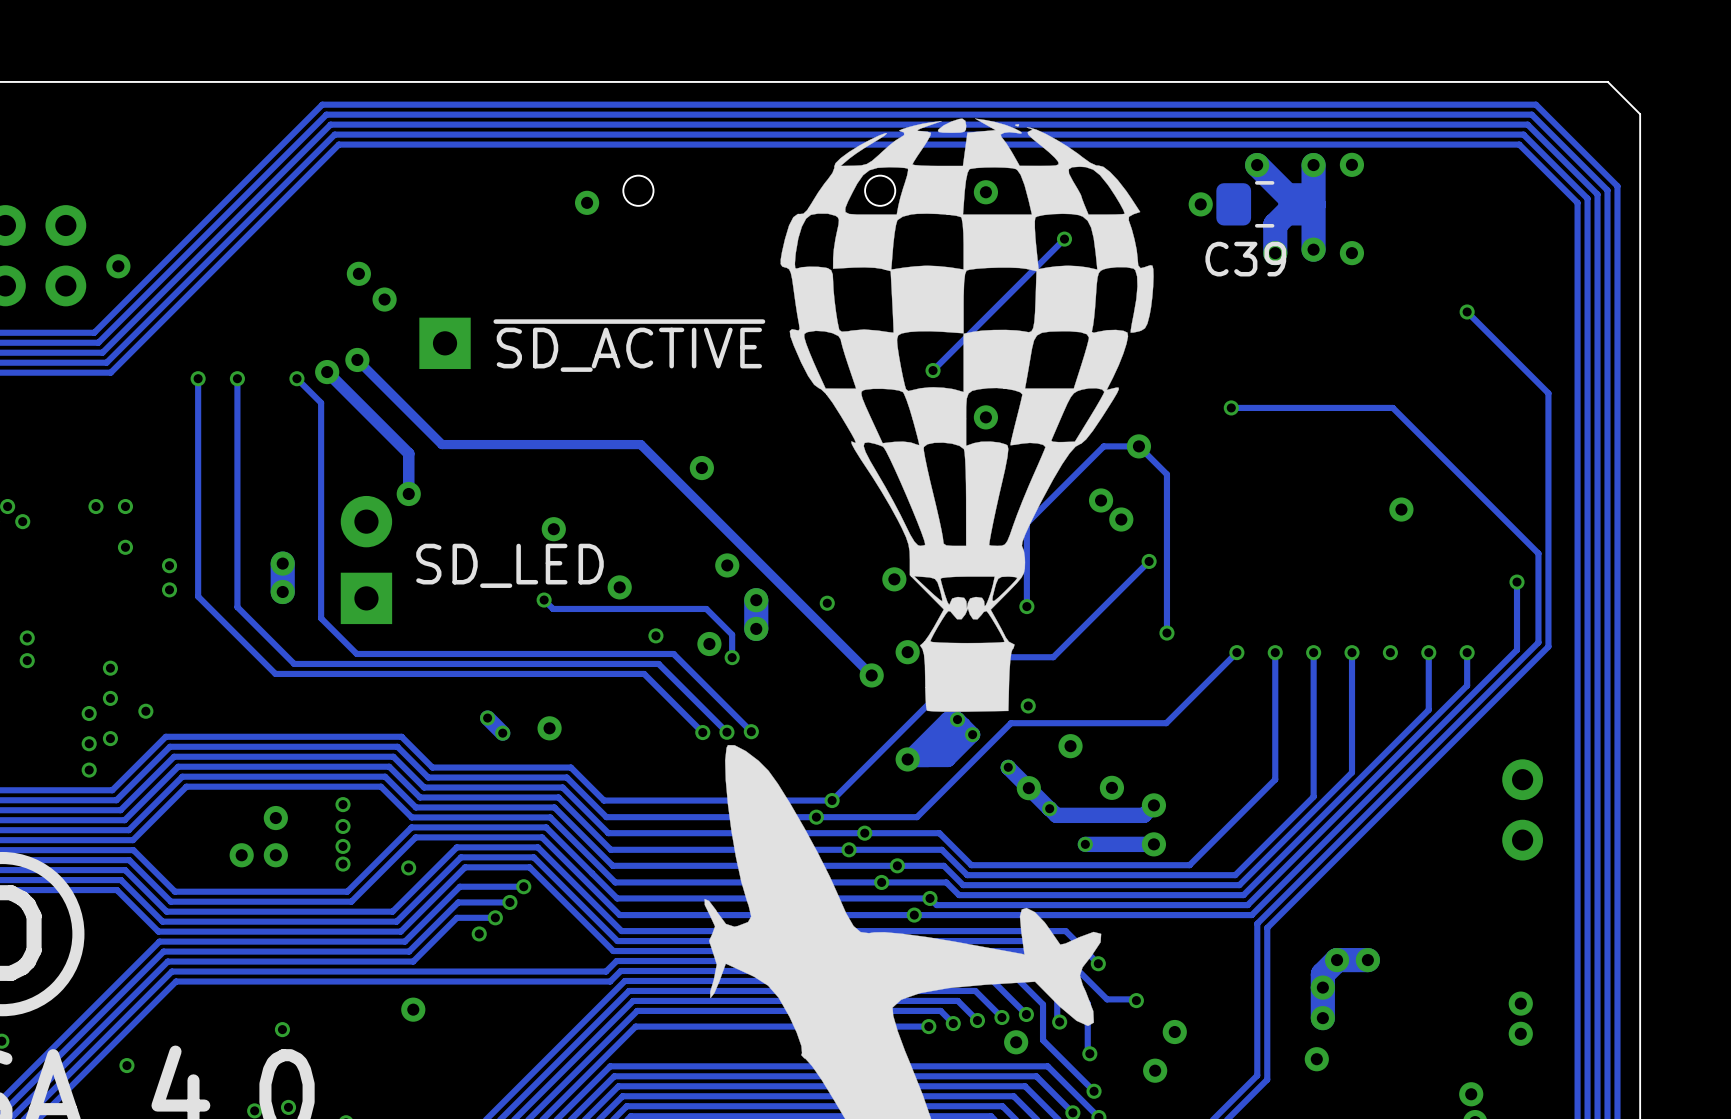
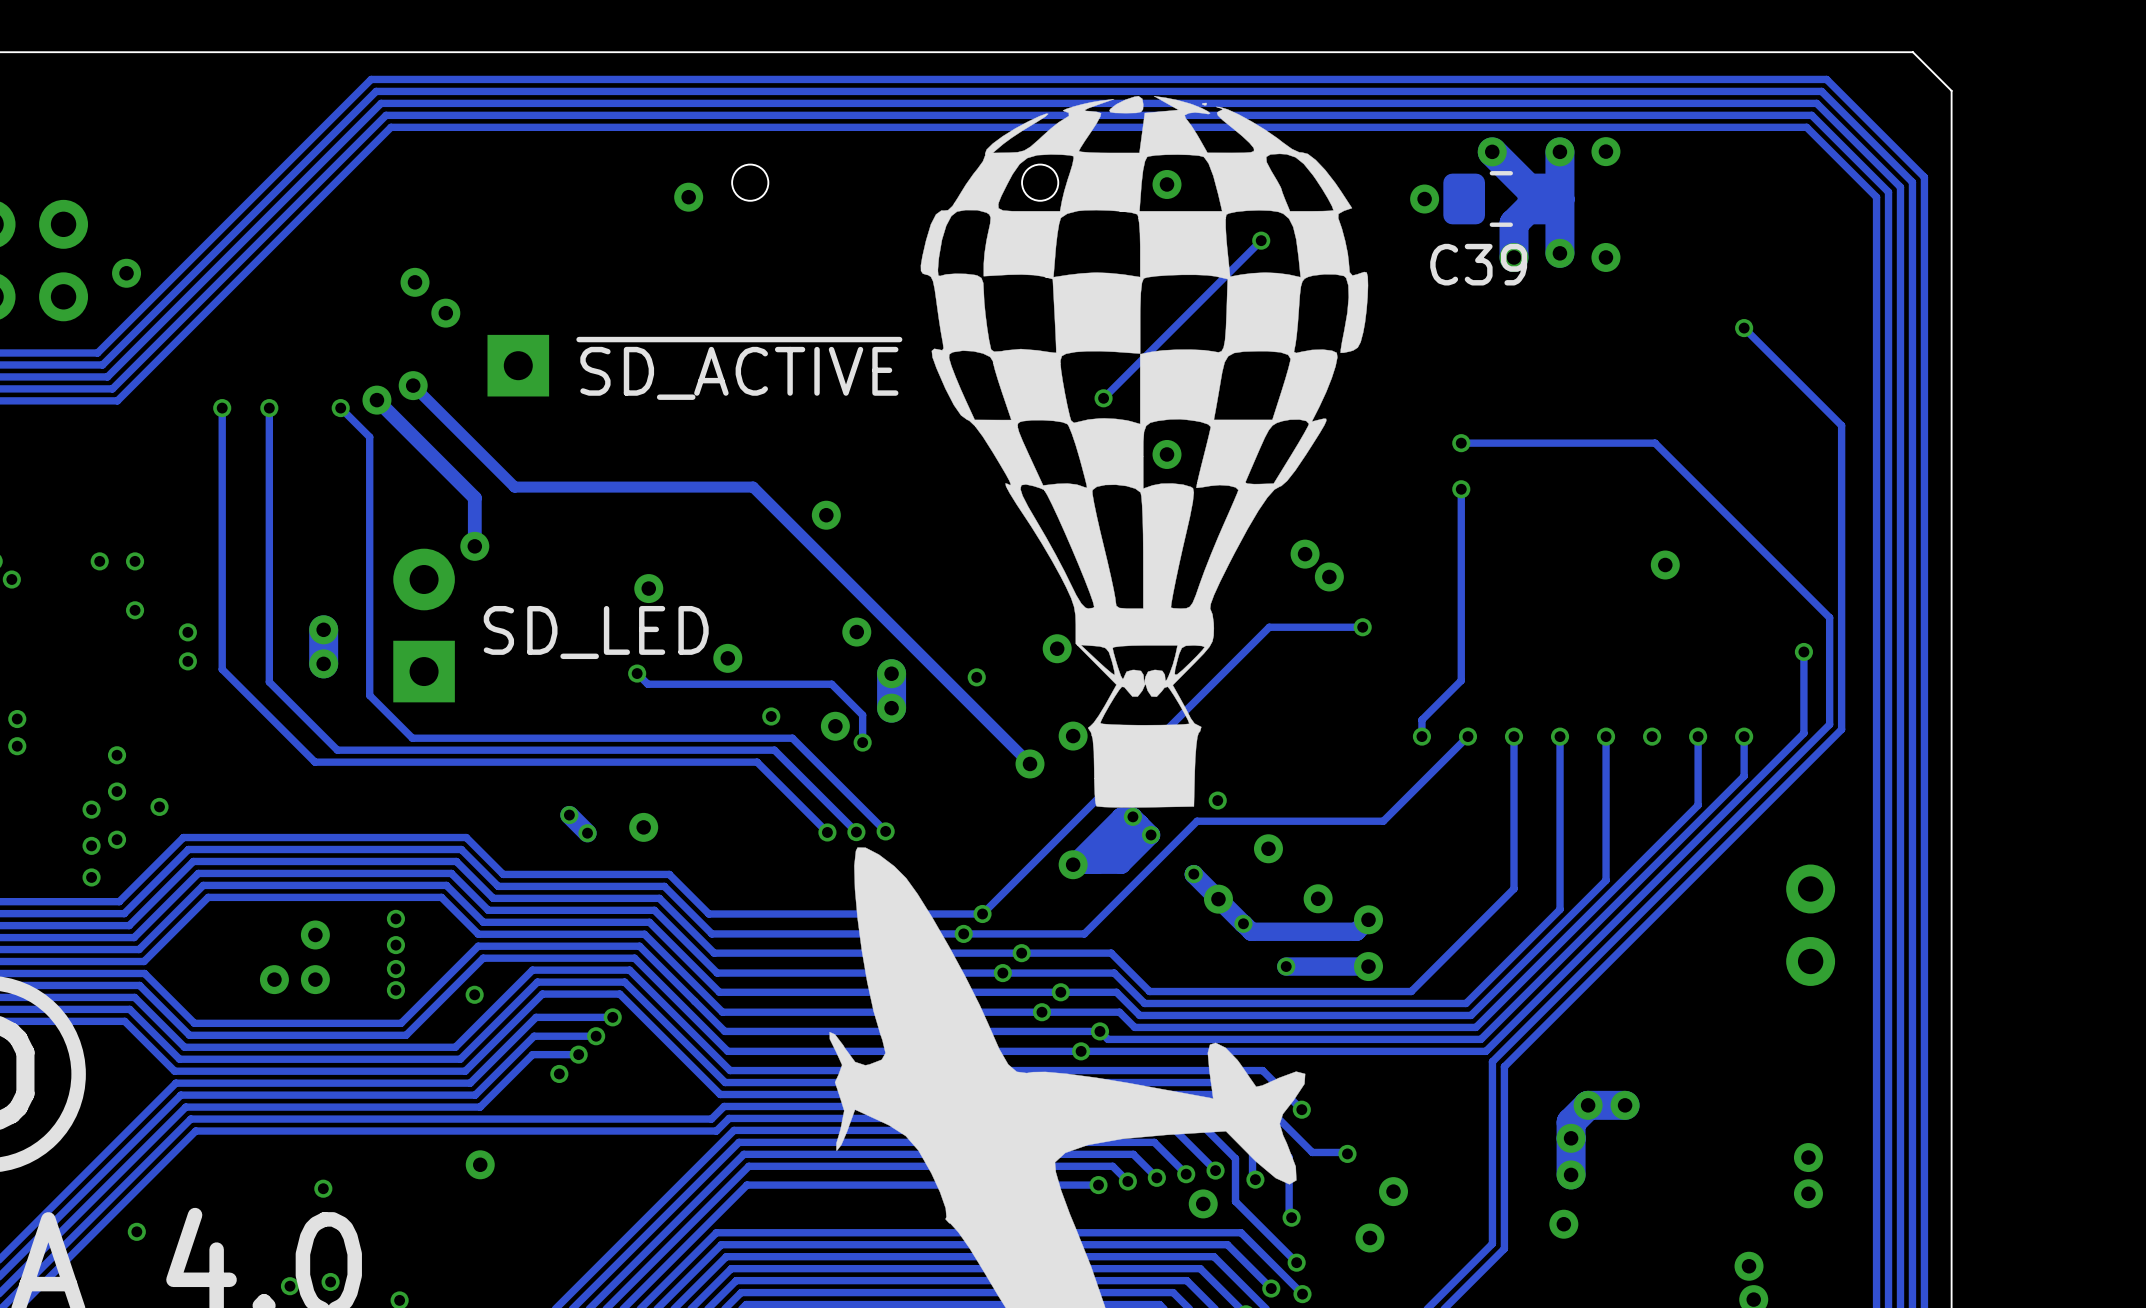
via: (1138, 446) -> none
track: none -> (1461, 489) (1461, 680) (1421, 719) (1421, 736)
via: none -> (1461, 489)
track: (1149, 561) (1053, 657) (975, 657) -> (1362, 627) (1269, 627) (1154, 742)
track: (1026, 606) (1026, 523) (1103, 446) (1138, 446) (1166, 474) (1166, 633) -> none
via: (1026, 606) -> none
via position: (1166, 633) -> (1421, 736)

